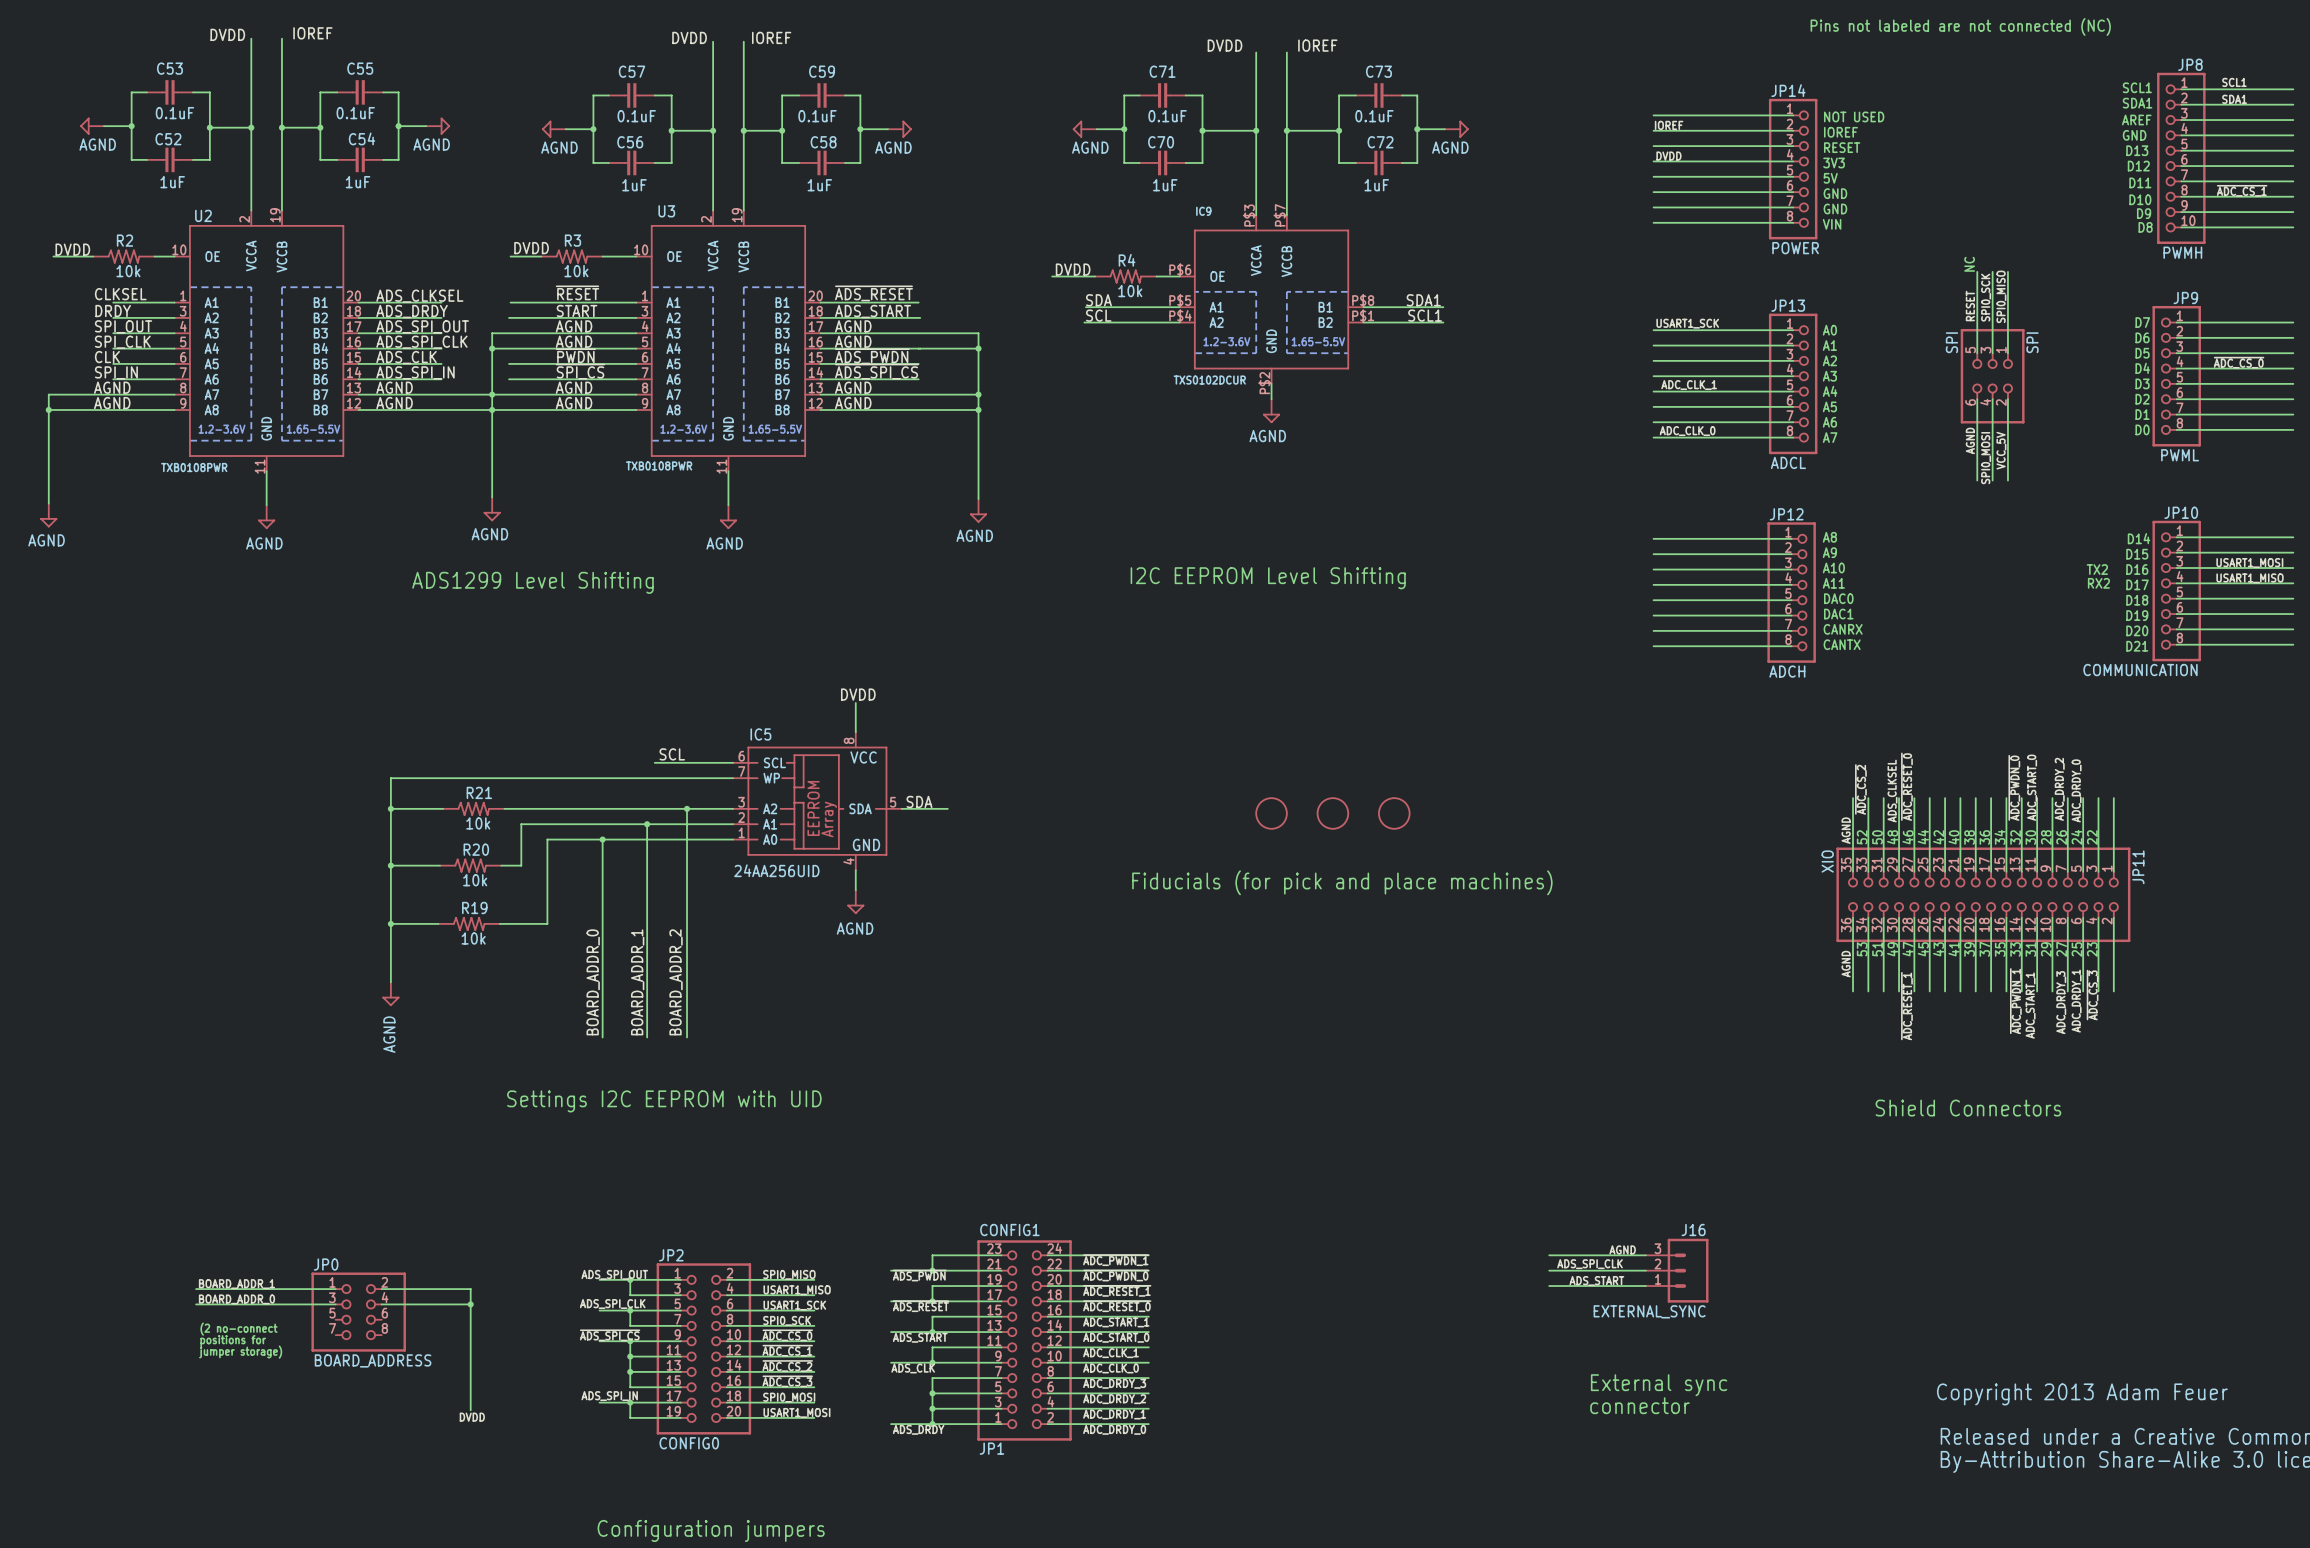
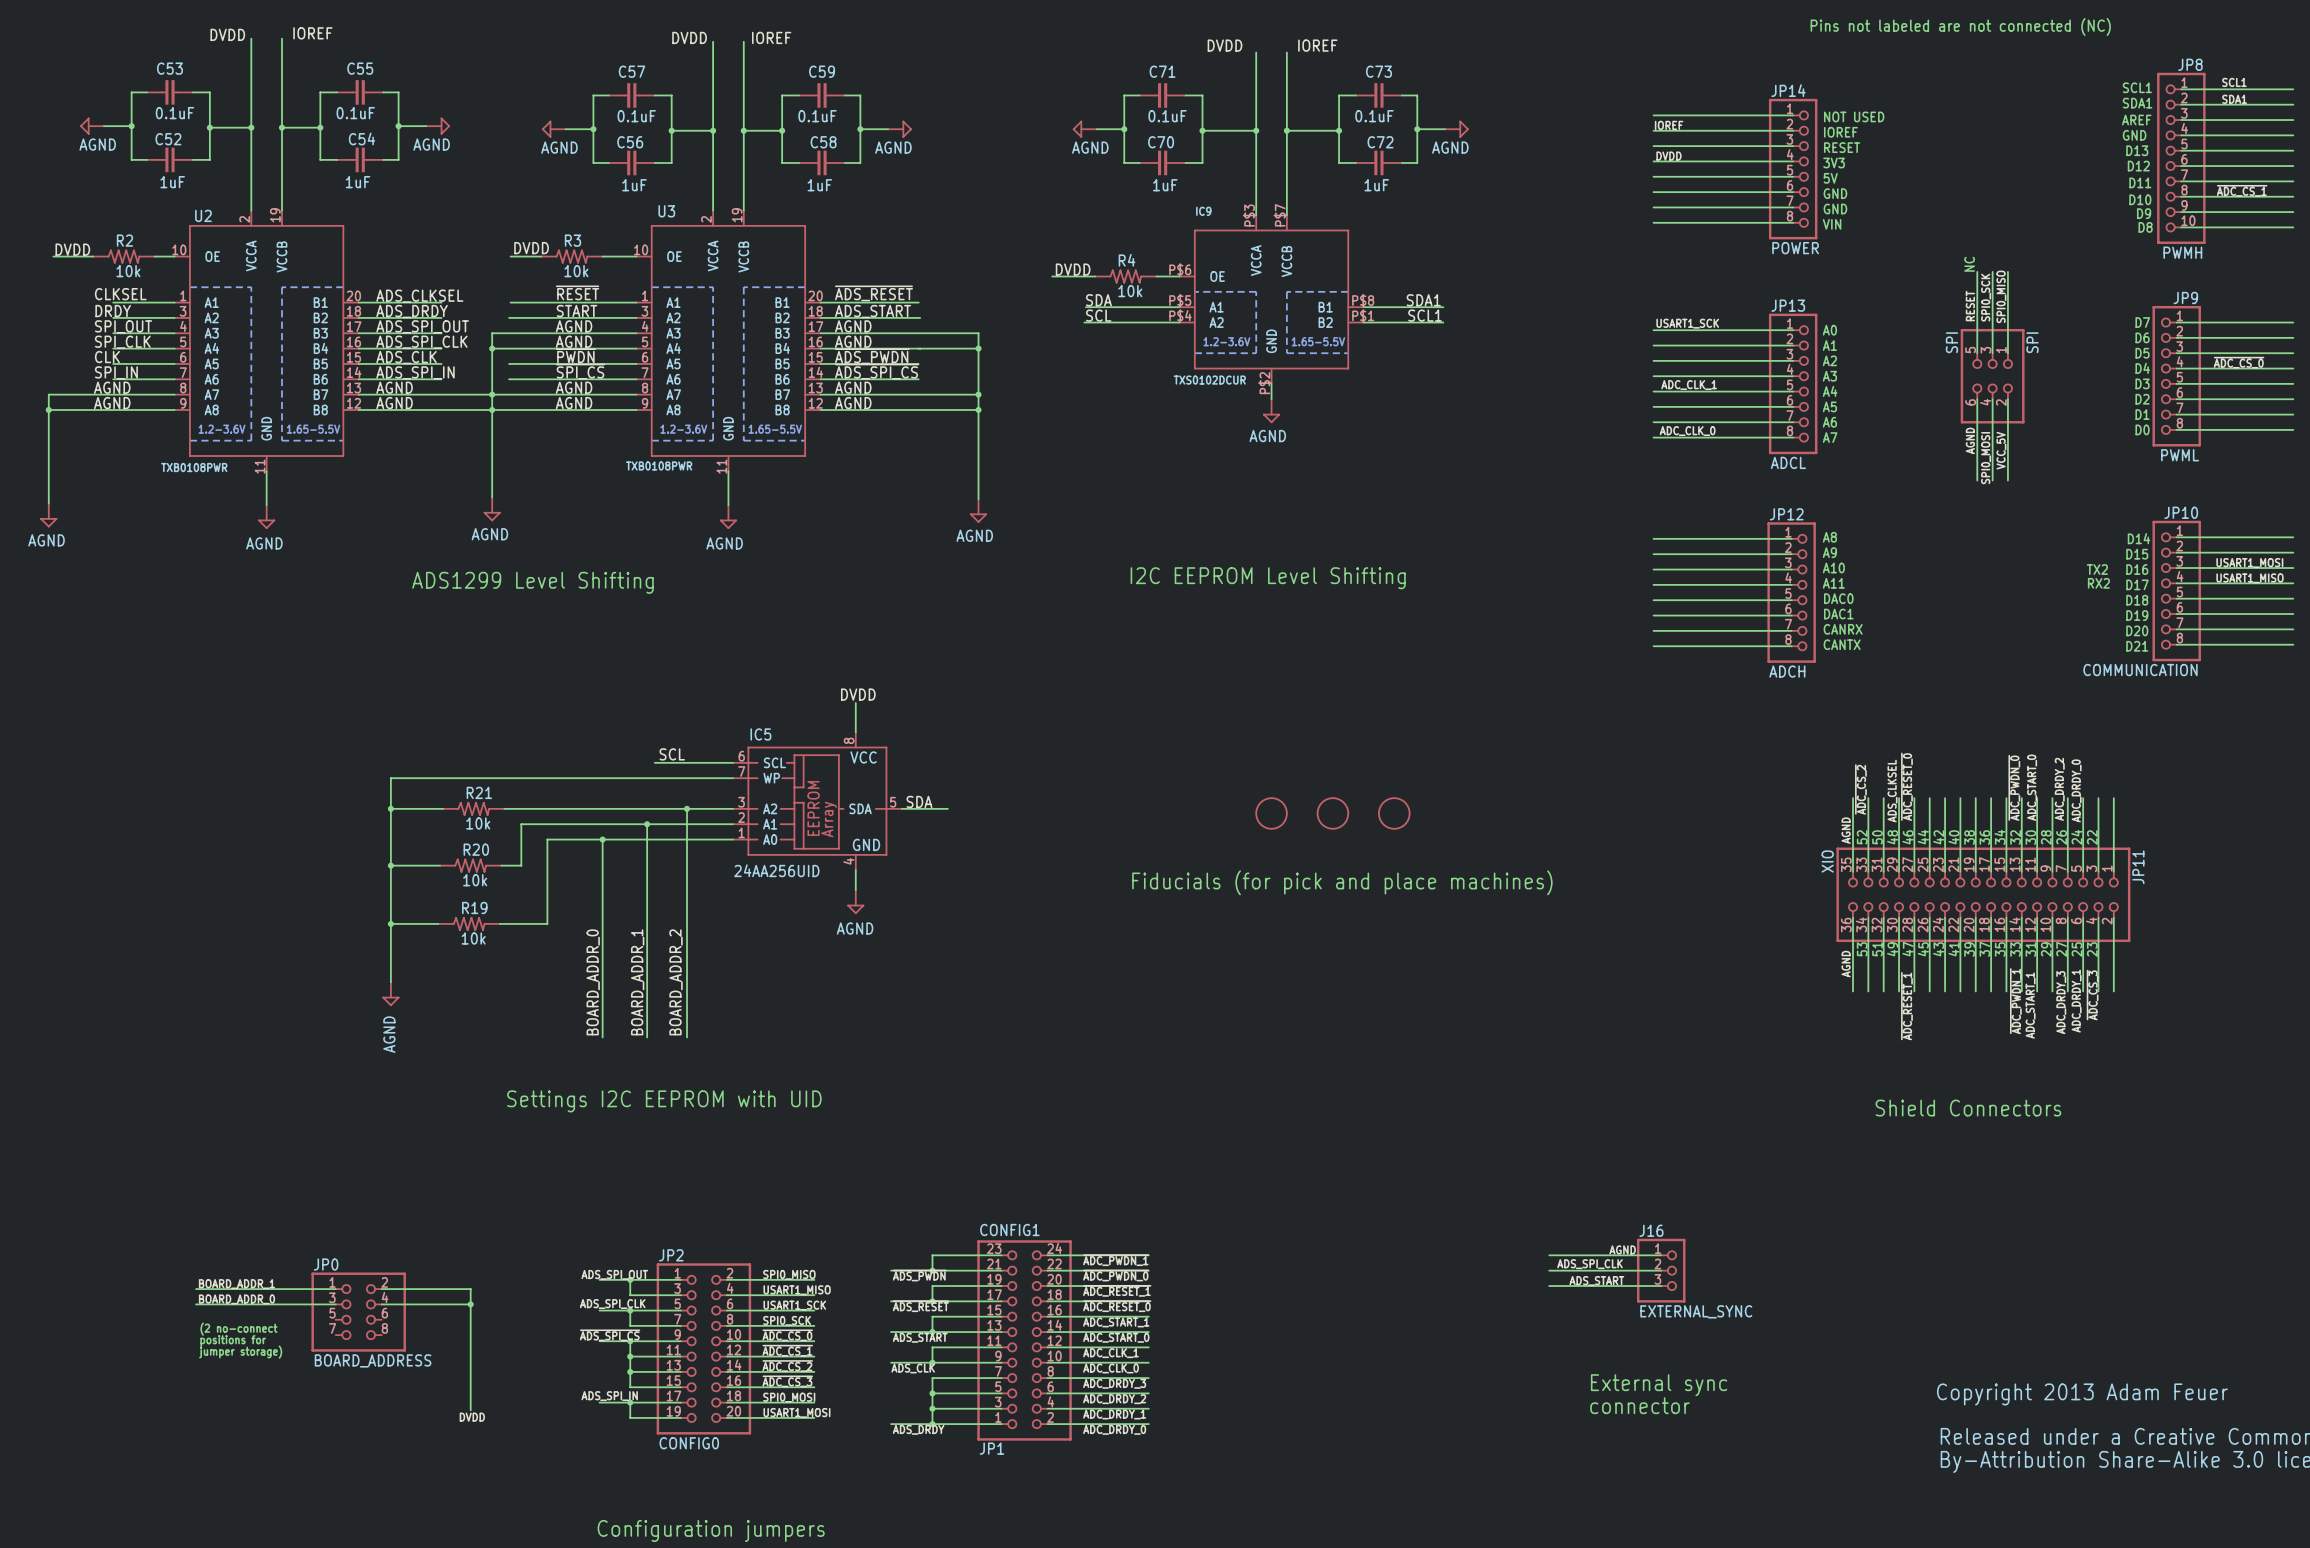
J16 name position: J16 (1693, 1230) -> J16 (1651, 1230)
J16 symbol: [1645, 1238, 1709, 1303] -> [1636, 1238, 1686, 1303]
J16 value position: EXTERNAL_SYNC (1649, 1311) -> EXTERNAL_SYNC (1696, 1311)

